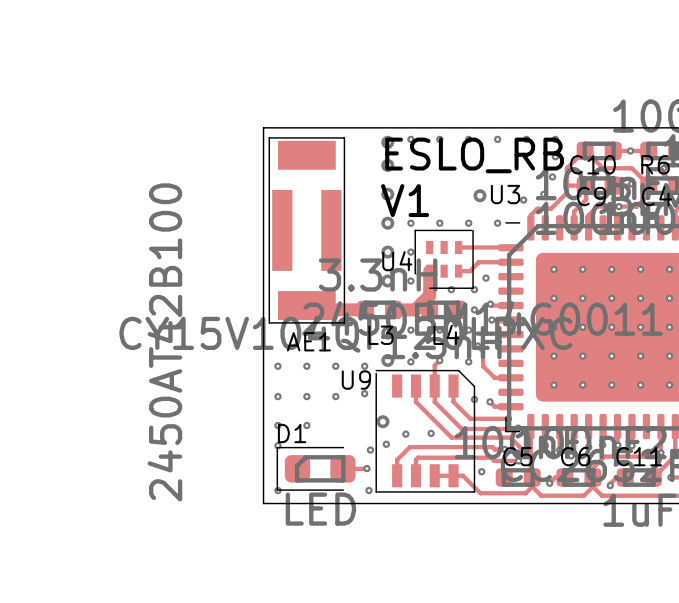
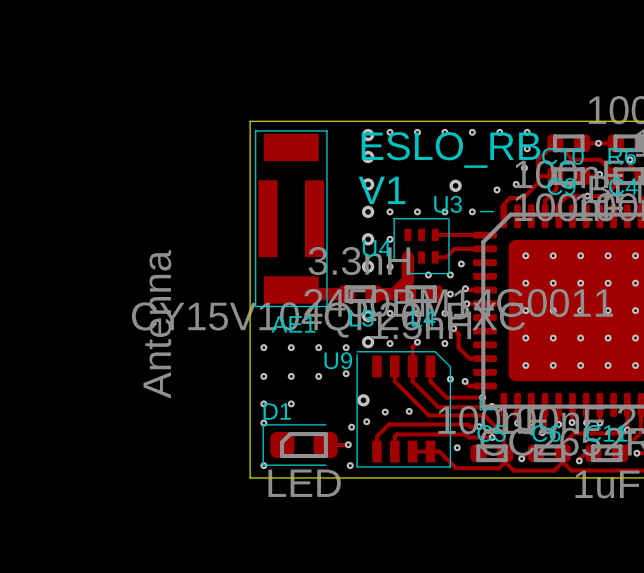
U3 name position: U3 (505, 194) -> U3 (448, 204)
AE1 value: 2450AT42B100 (164, 342) -> Antenna (157, 324)

